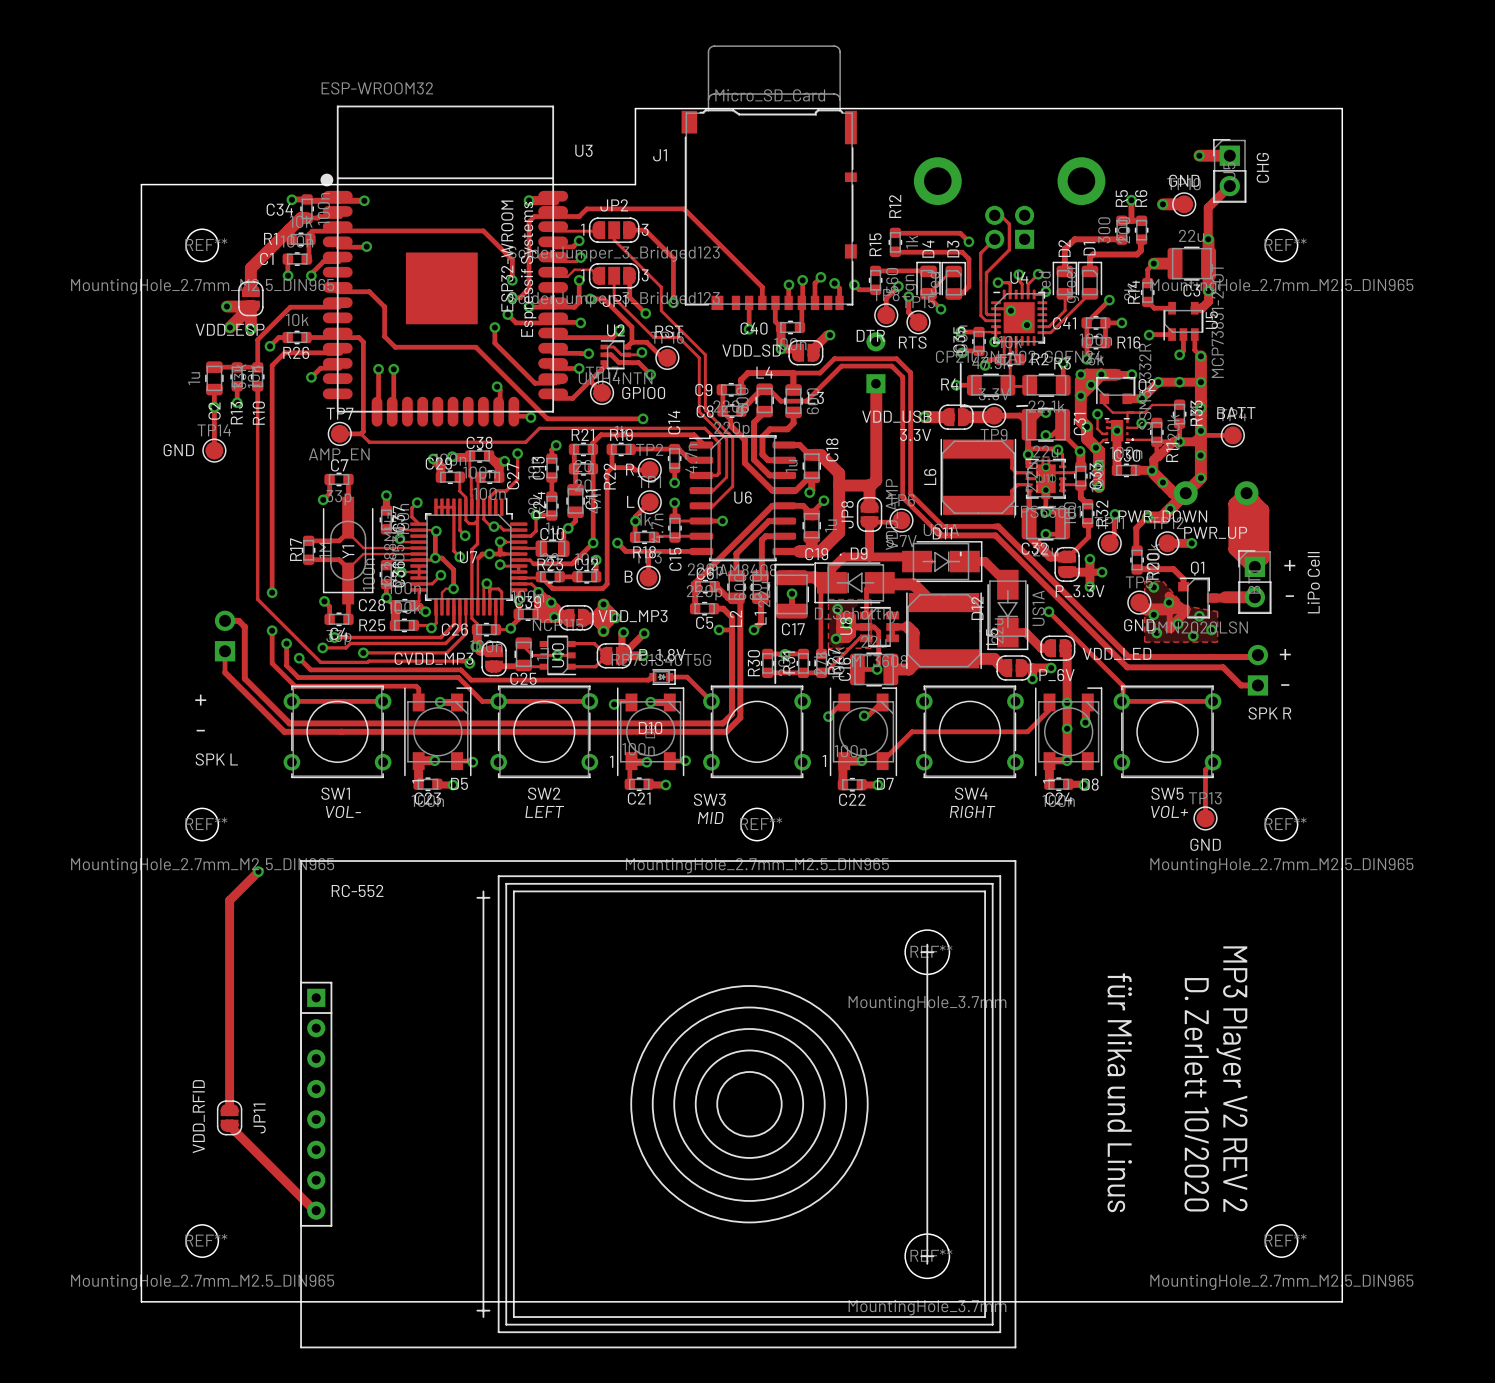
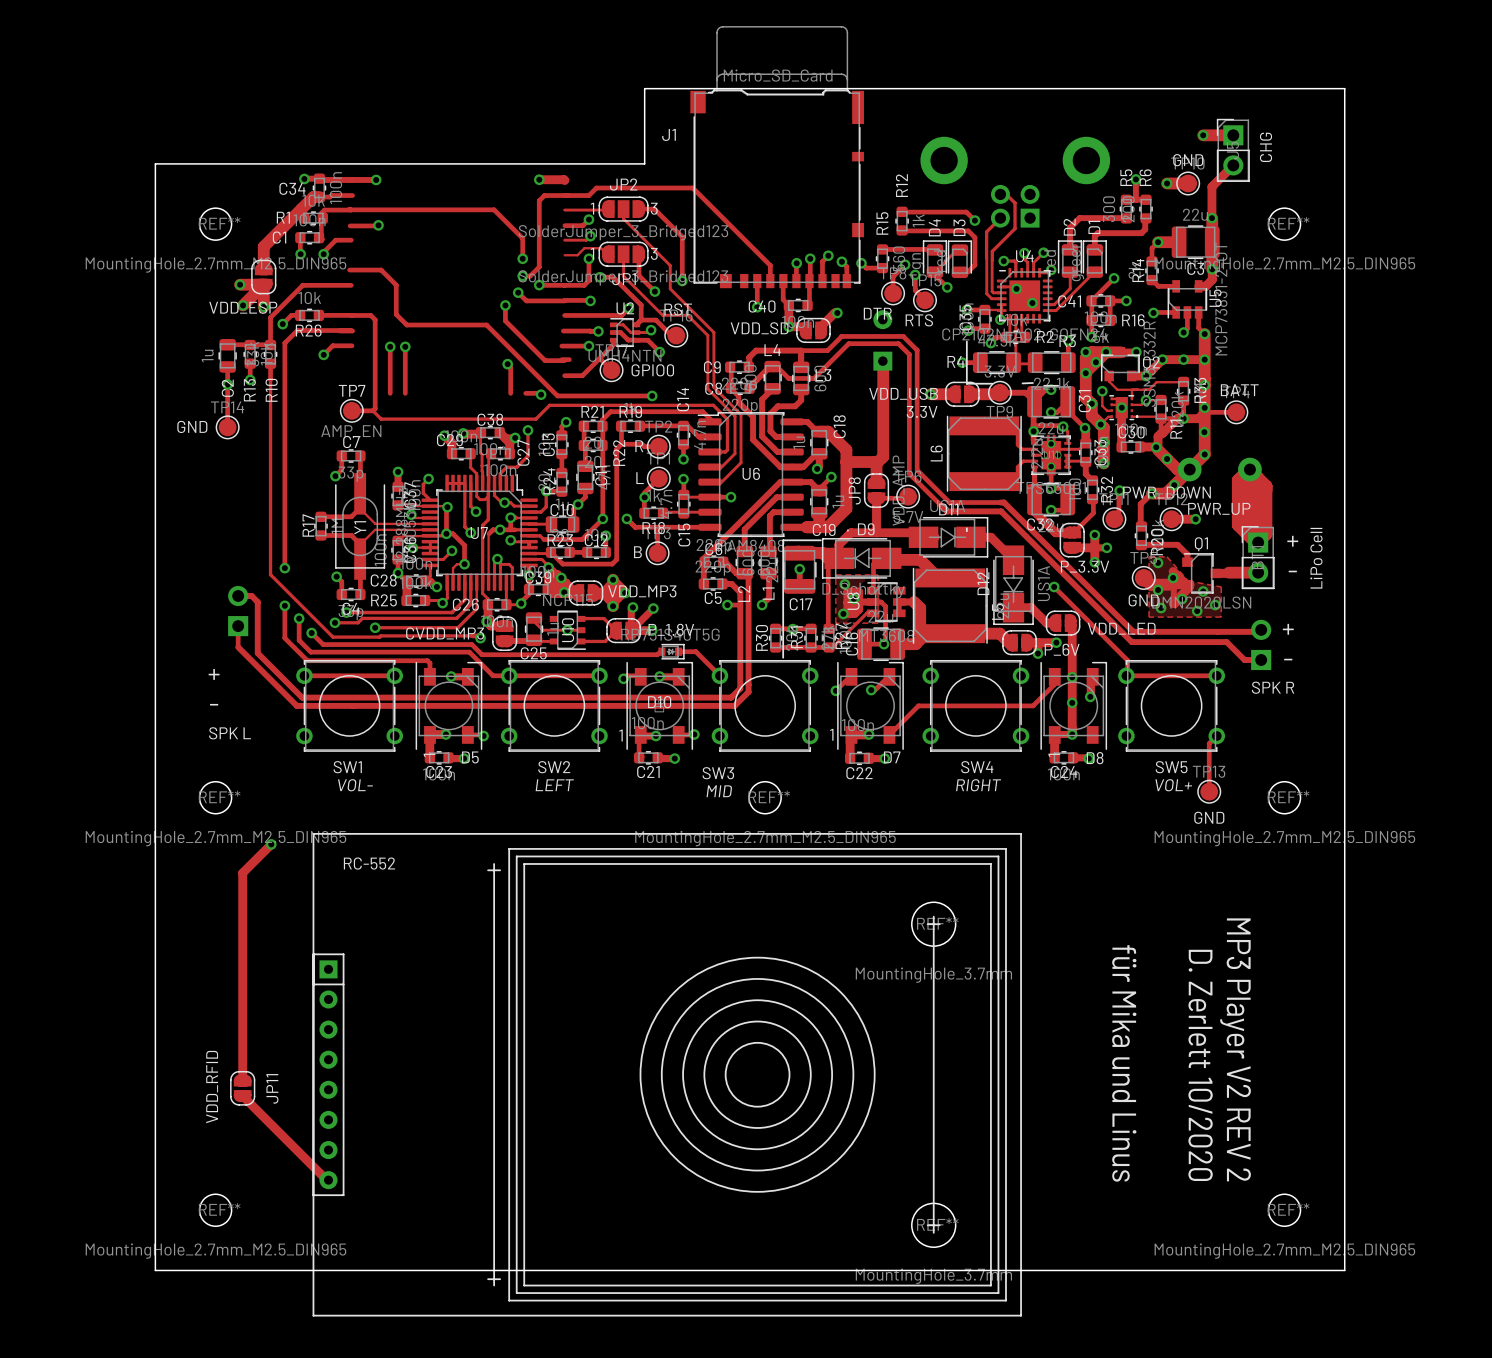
U3: ESP-WROOM32 (444, 266) -> none

